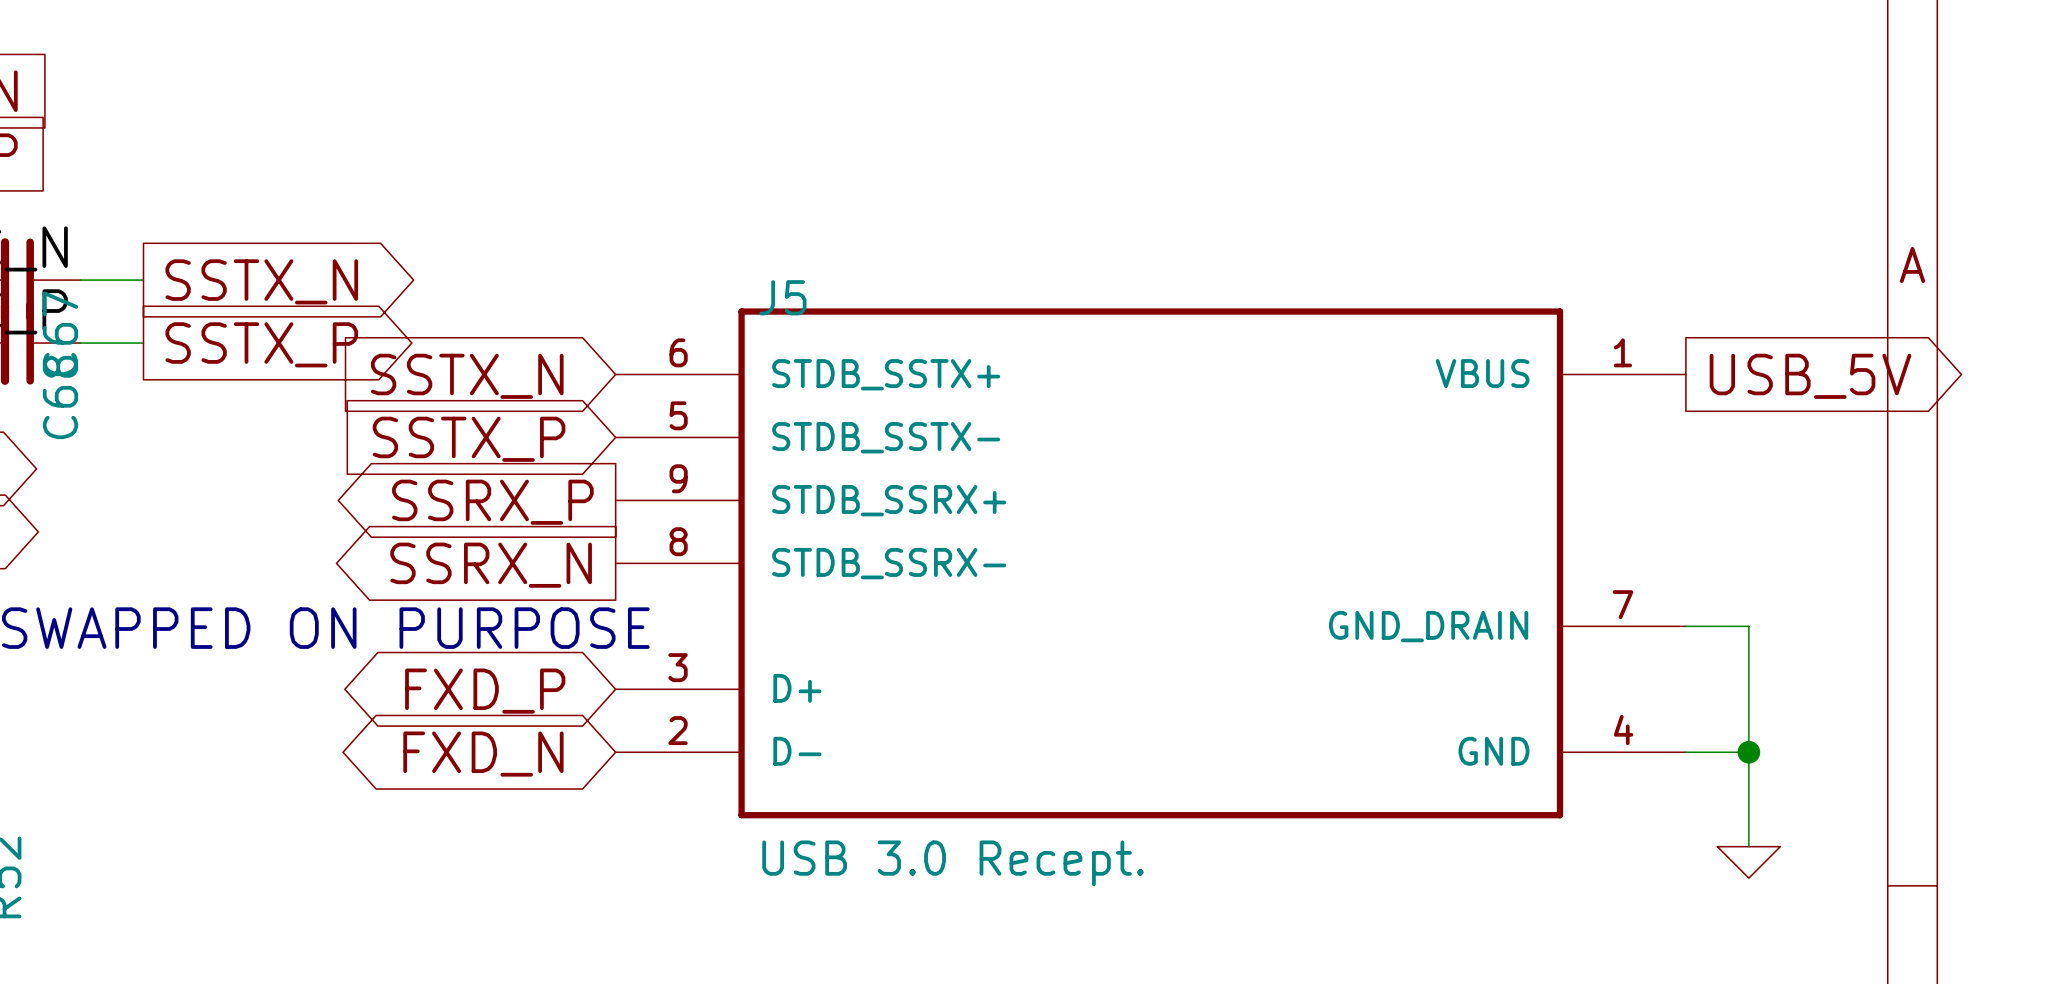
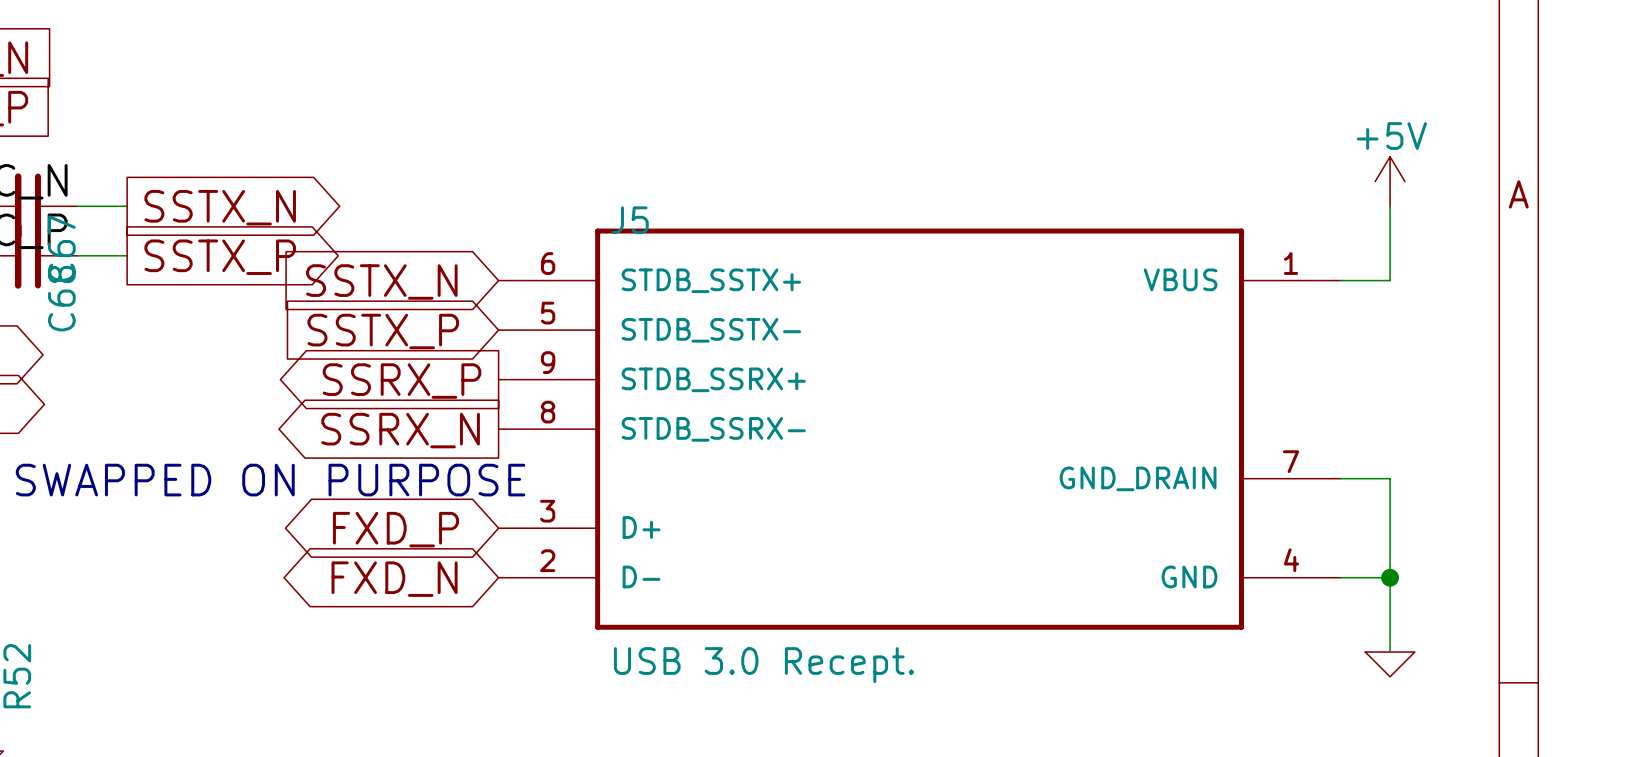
power symbol: none -> +5V (1390, 181)
wire: none -> (1390, 206) (1390, 280) (1340, 280)
global label: USB_5V (1810, 376) -> none

